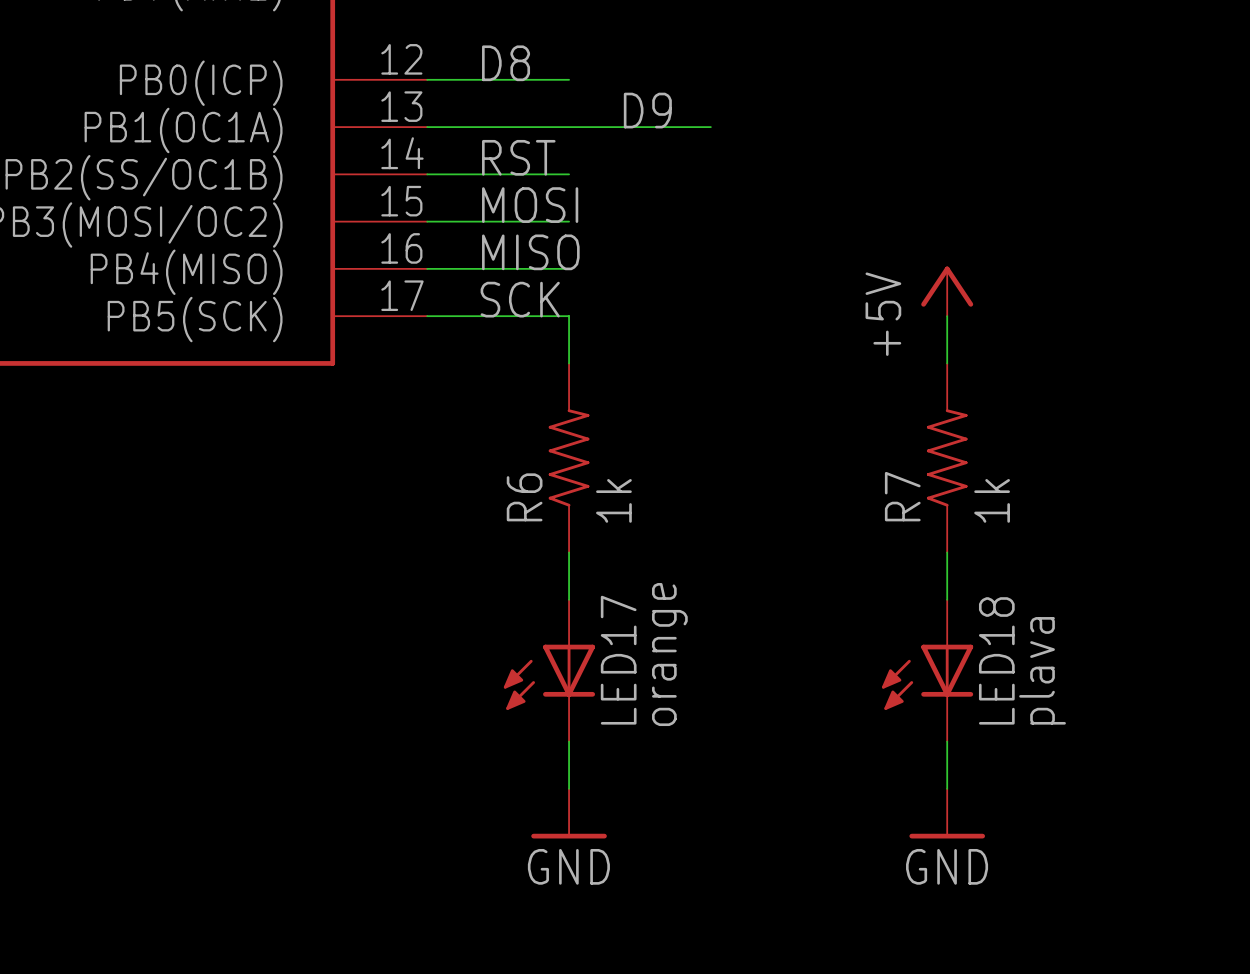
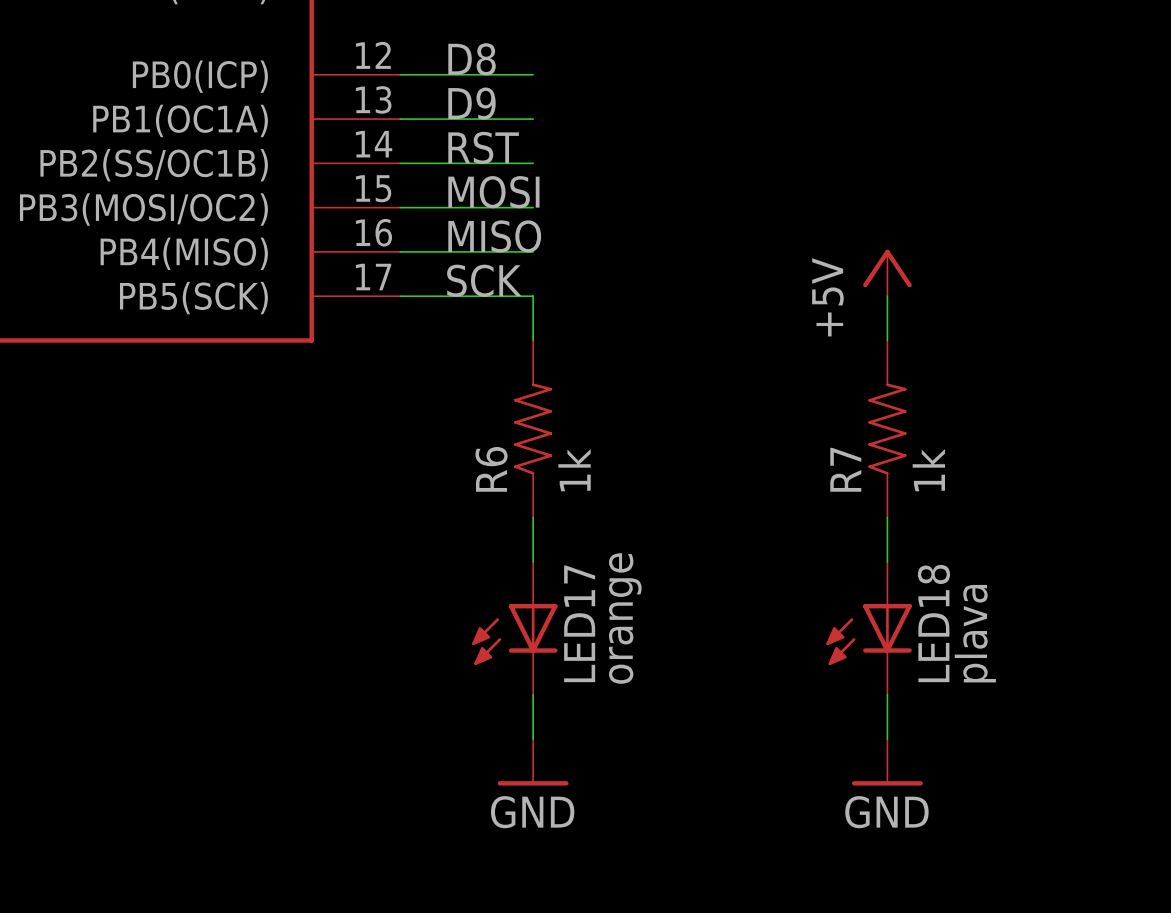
label position: D9 (647, 110) -> D9 (472, 103)
wire: (569, 127) (710, 127) -> none

